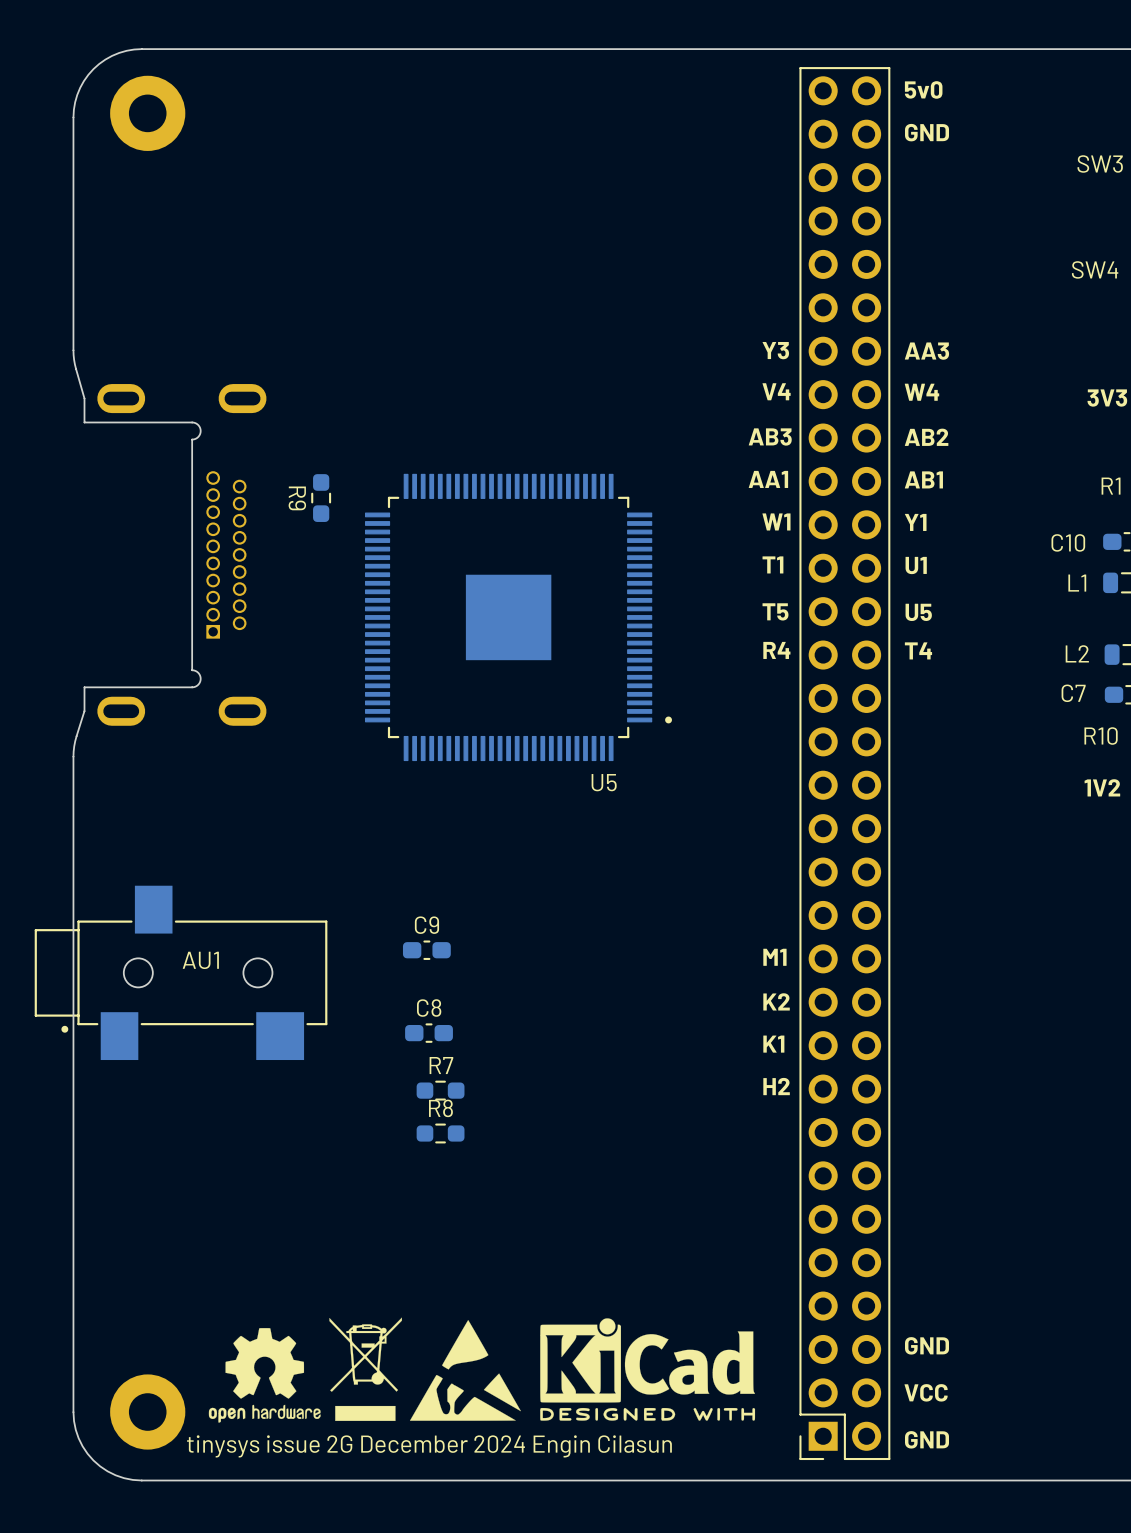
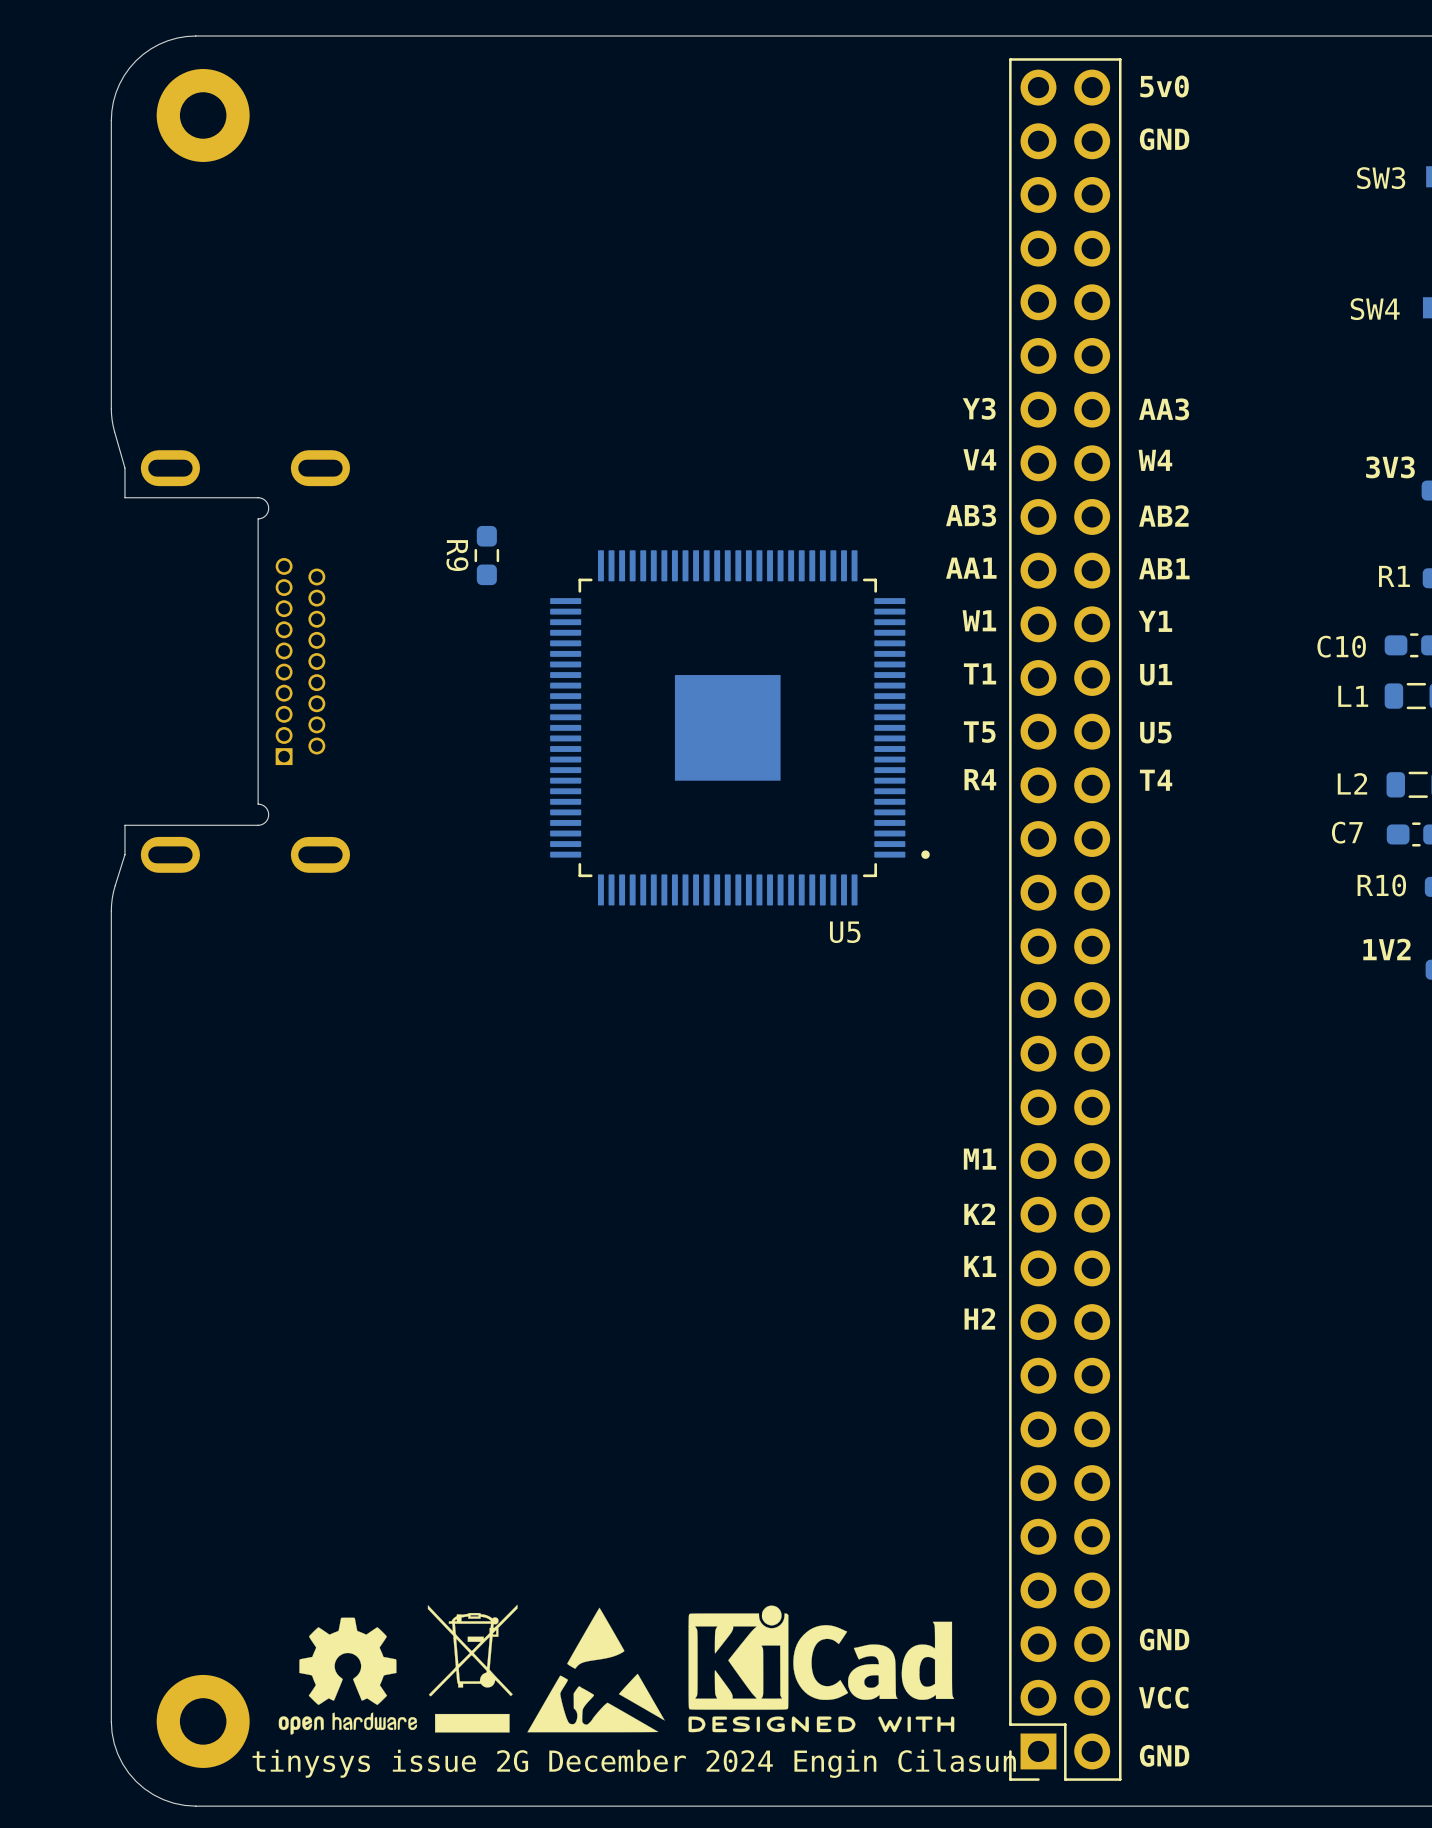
R9 position: (321, 498) -> (486, 555)
U5 position: (518, 617) -> (739, 727)
C9: (426, 950) -> none
AU1: (181, 972) -> none
C8: (429, 1033) -> none
R7: (440, 1090) -> none
R8: (440, 1133) -> none

